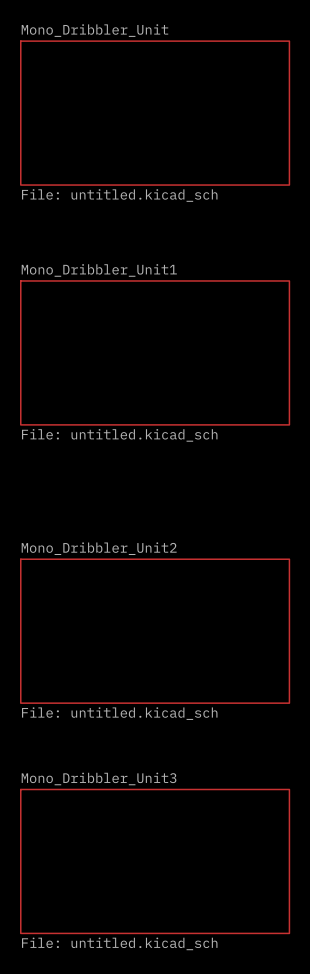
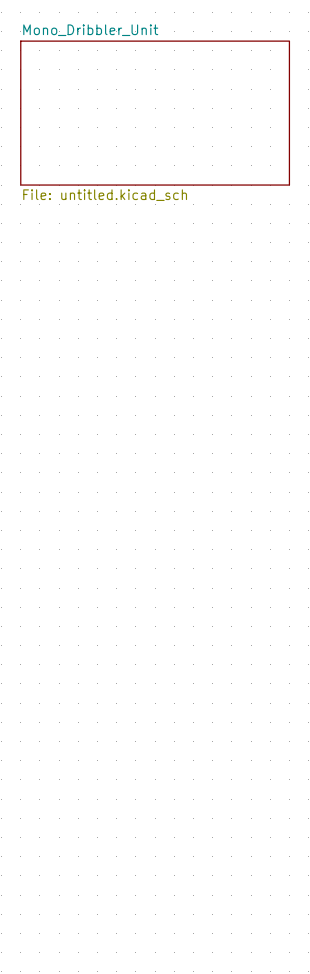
sheet Mono_Dribbler_Unit1: File: untitled.kicad_sch (155, 352) -> none
sheet Mono_Dribbler_Unit2: File: untitled.kicad_sch (155, 631) -> none
sheet Mono_Dribbler_Unit3: File: untitled.kicad_sch (155, 861) -> none

